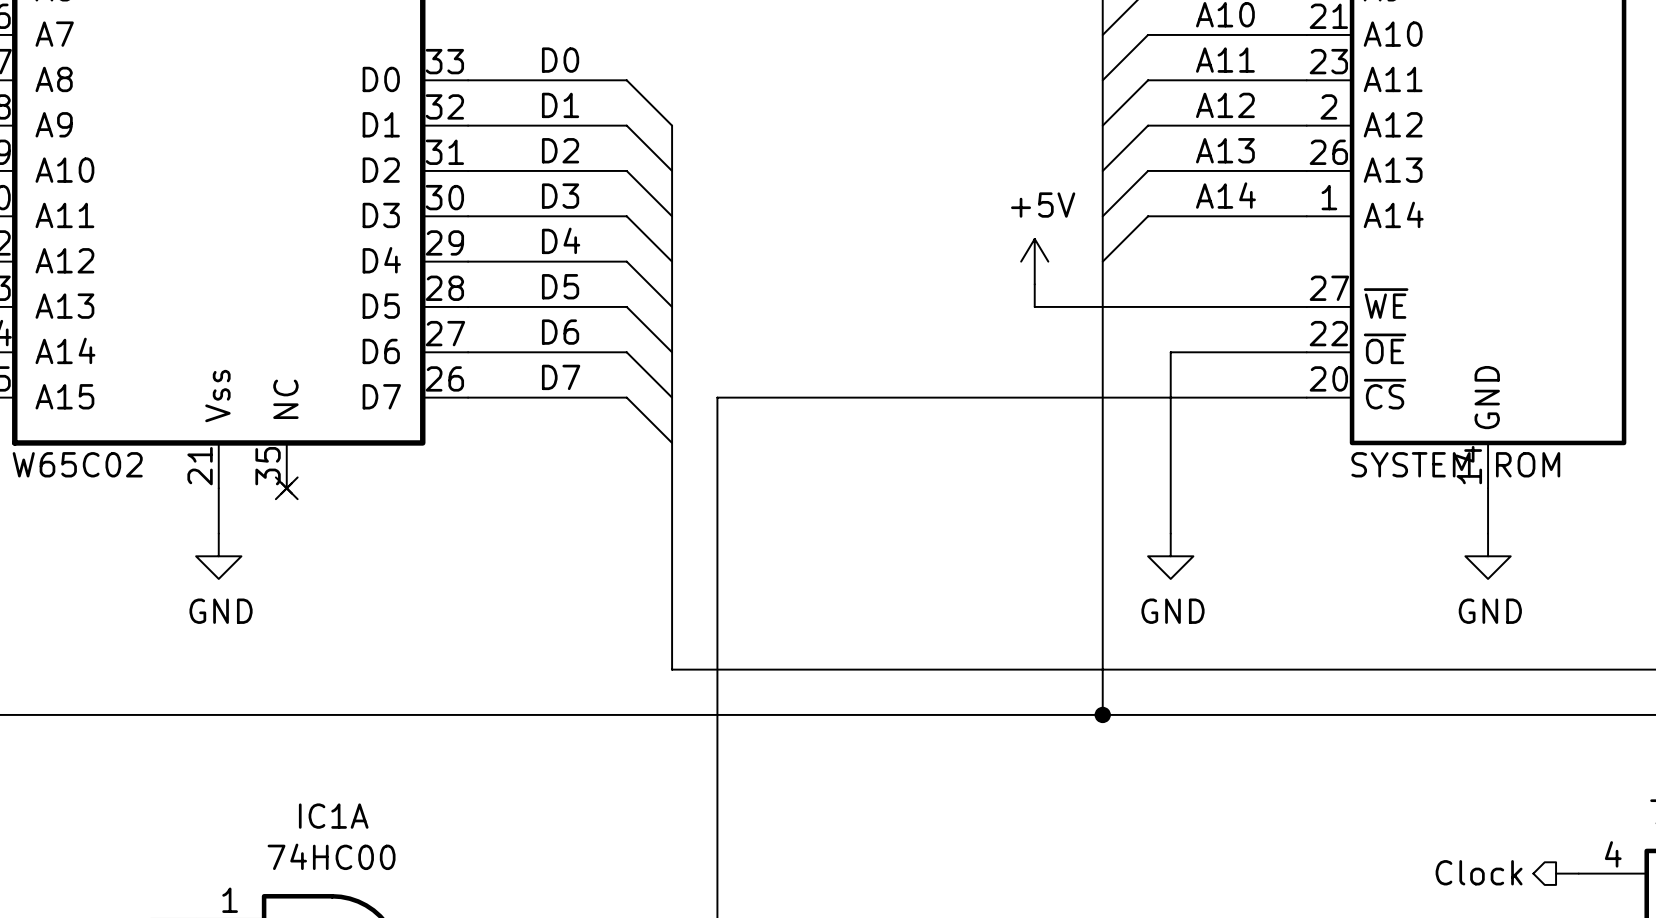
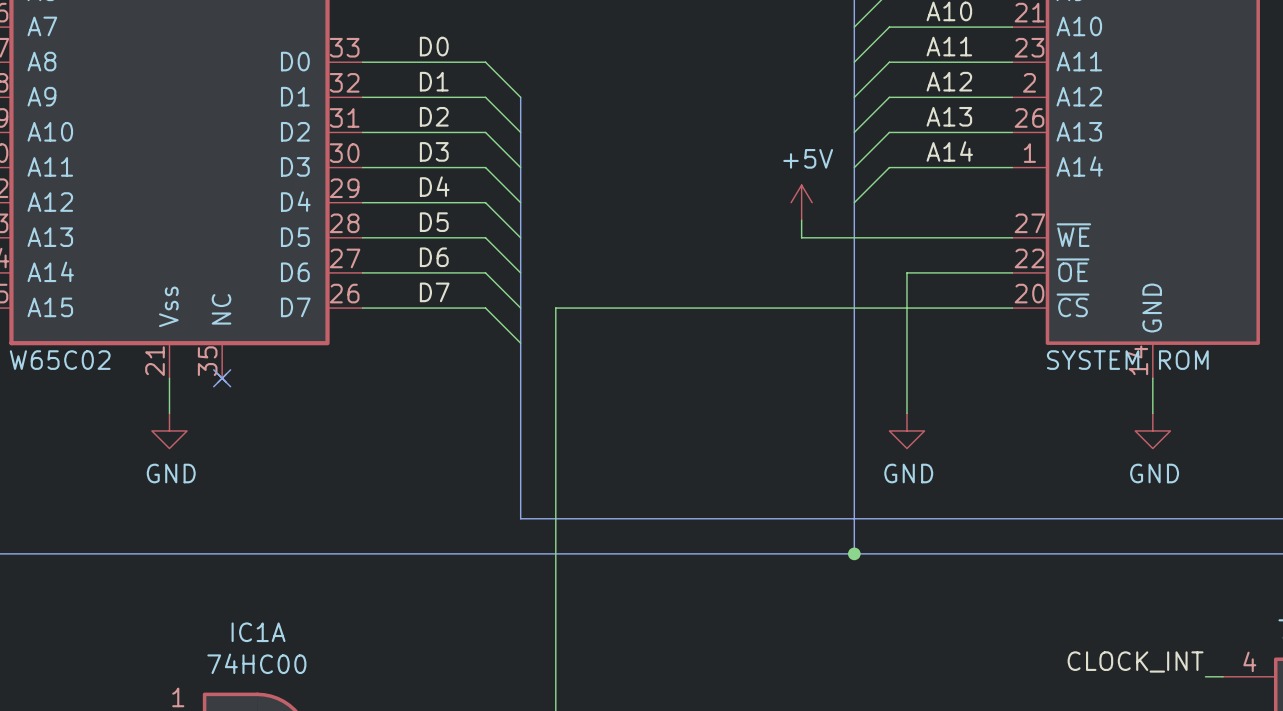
label: none -> CLOCK_INT (1135, 661)
hierarchical label: Clock (1479, 872) -> none

